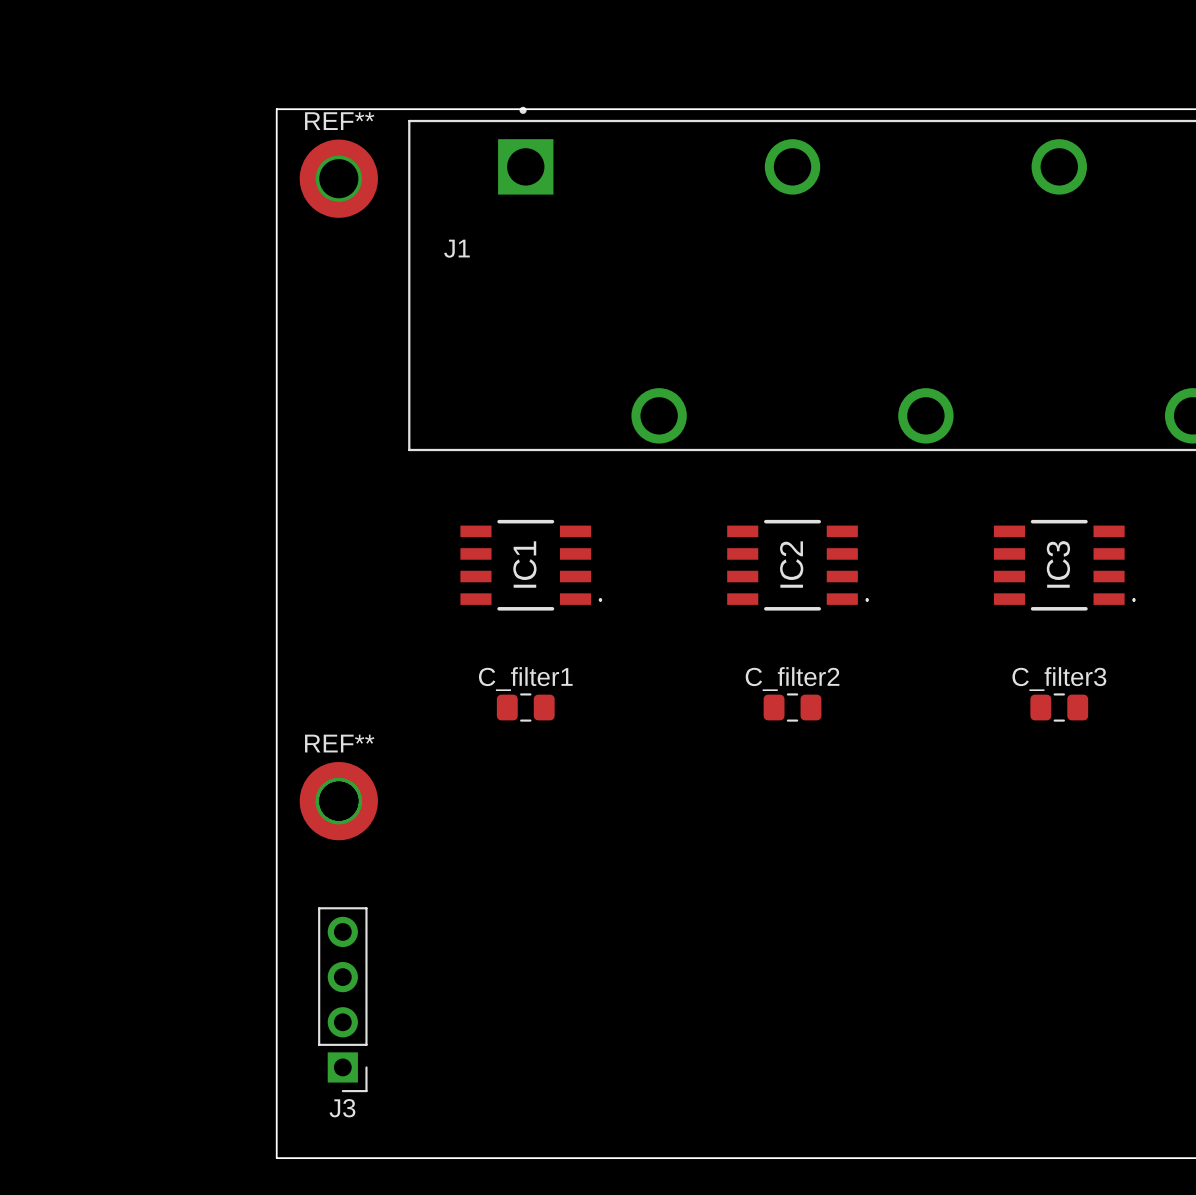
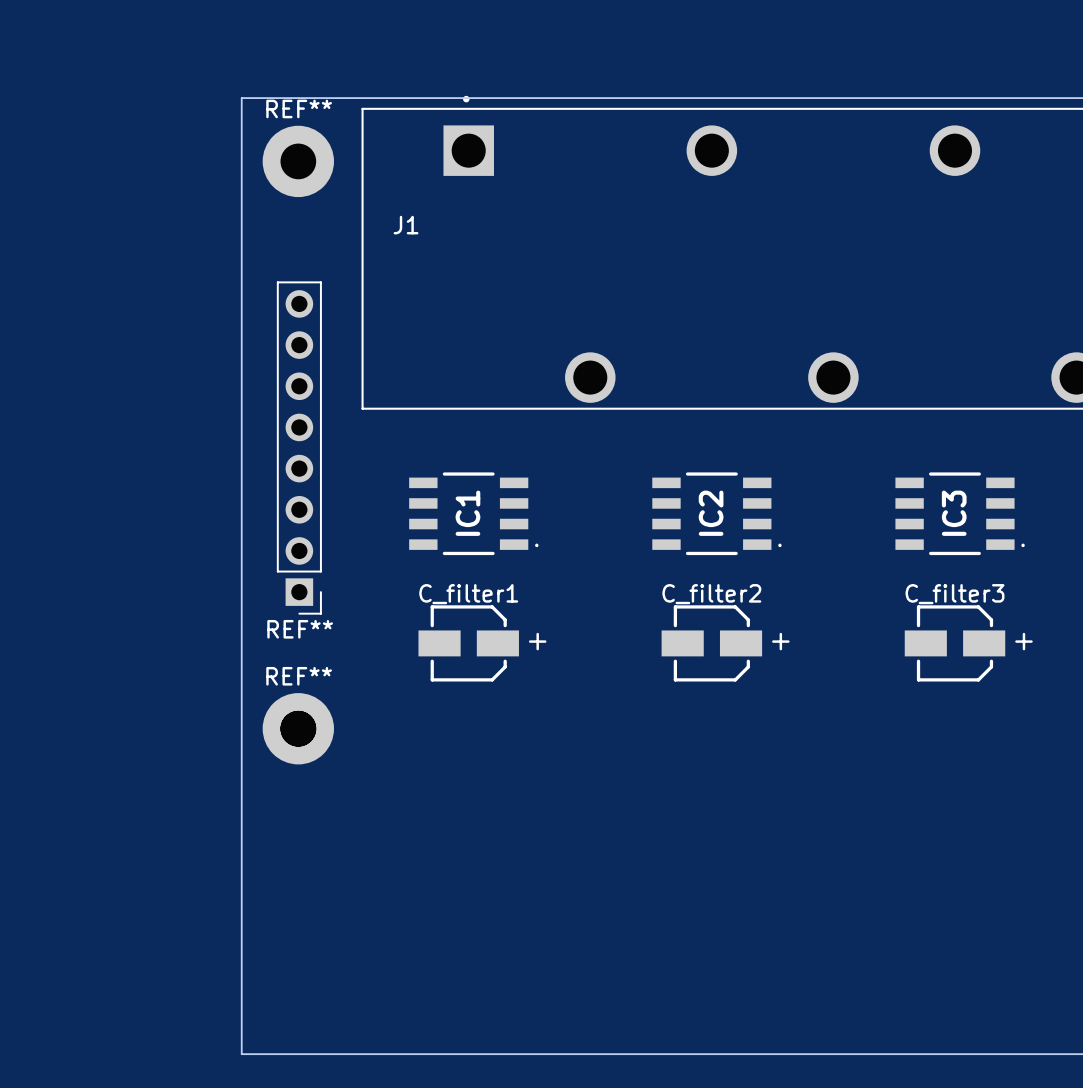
REF**: none -> (299, 448)
C_filter1 footprint: [496, 693, 555, 722] -> [418, 605, 519, 682]
C_filter2 footprint: [763, 693, 822, 722] -> [661, 605, 763, 682]
C_filter3 footprint: [1030, 693, 1089, 722] -> [904, 605, 1006, 682]
J3: (342, 999) -> none

